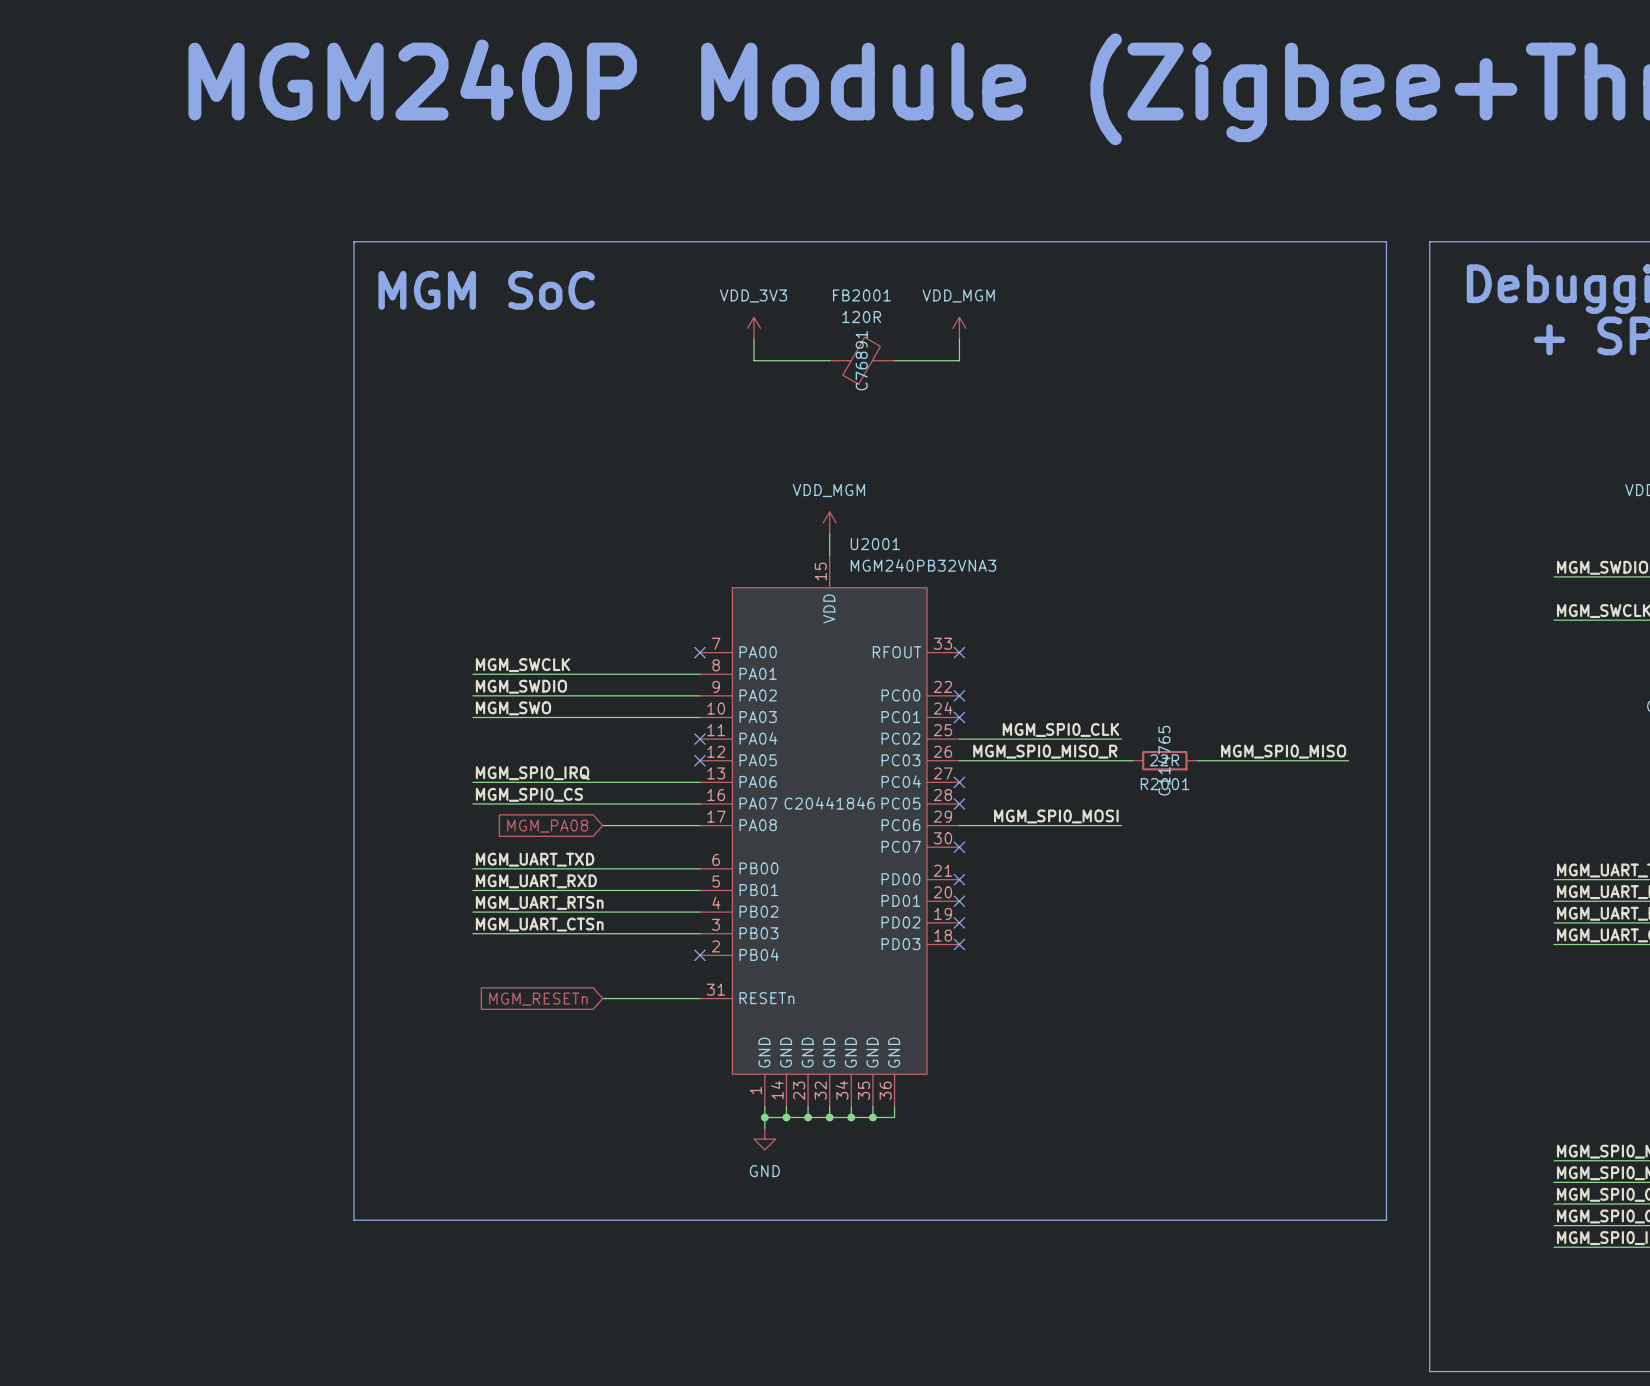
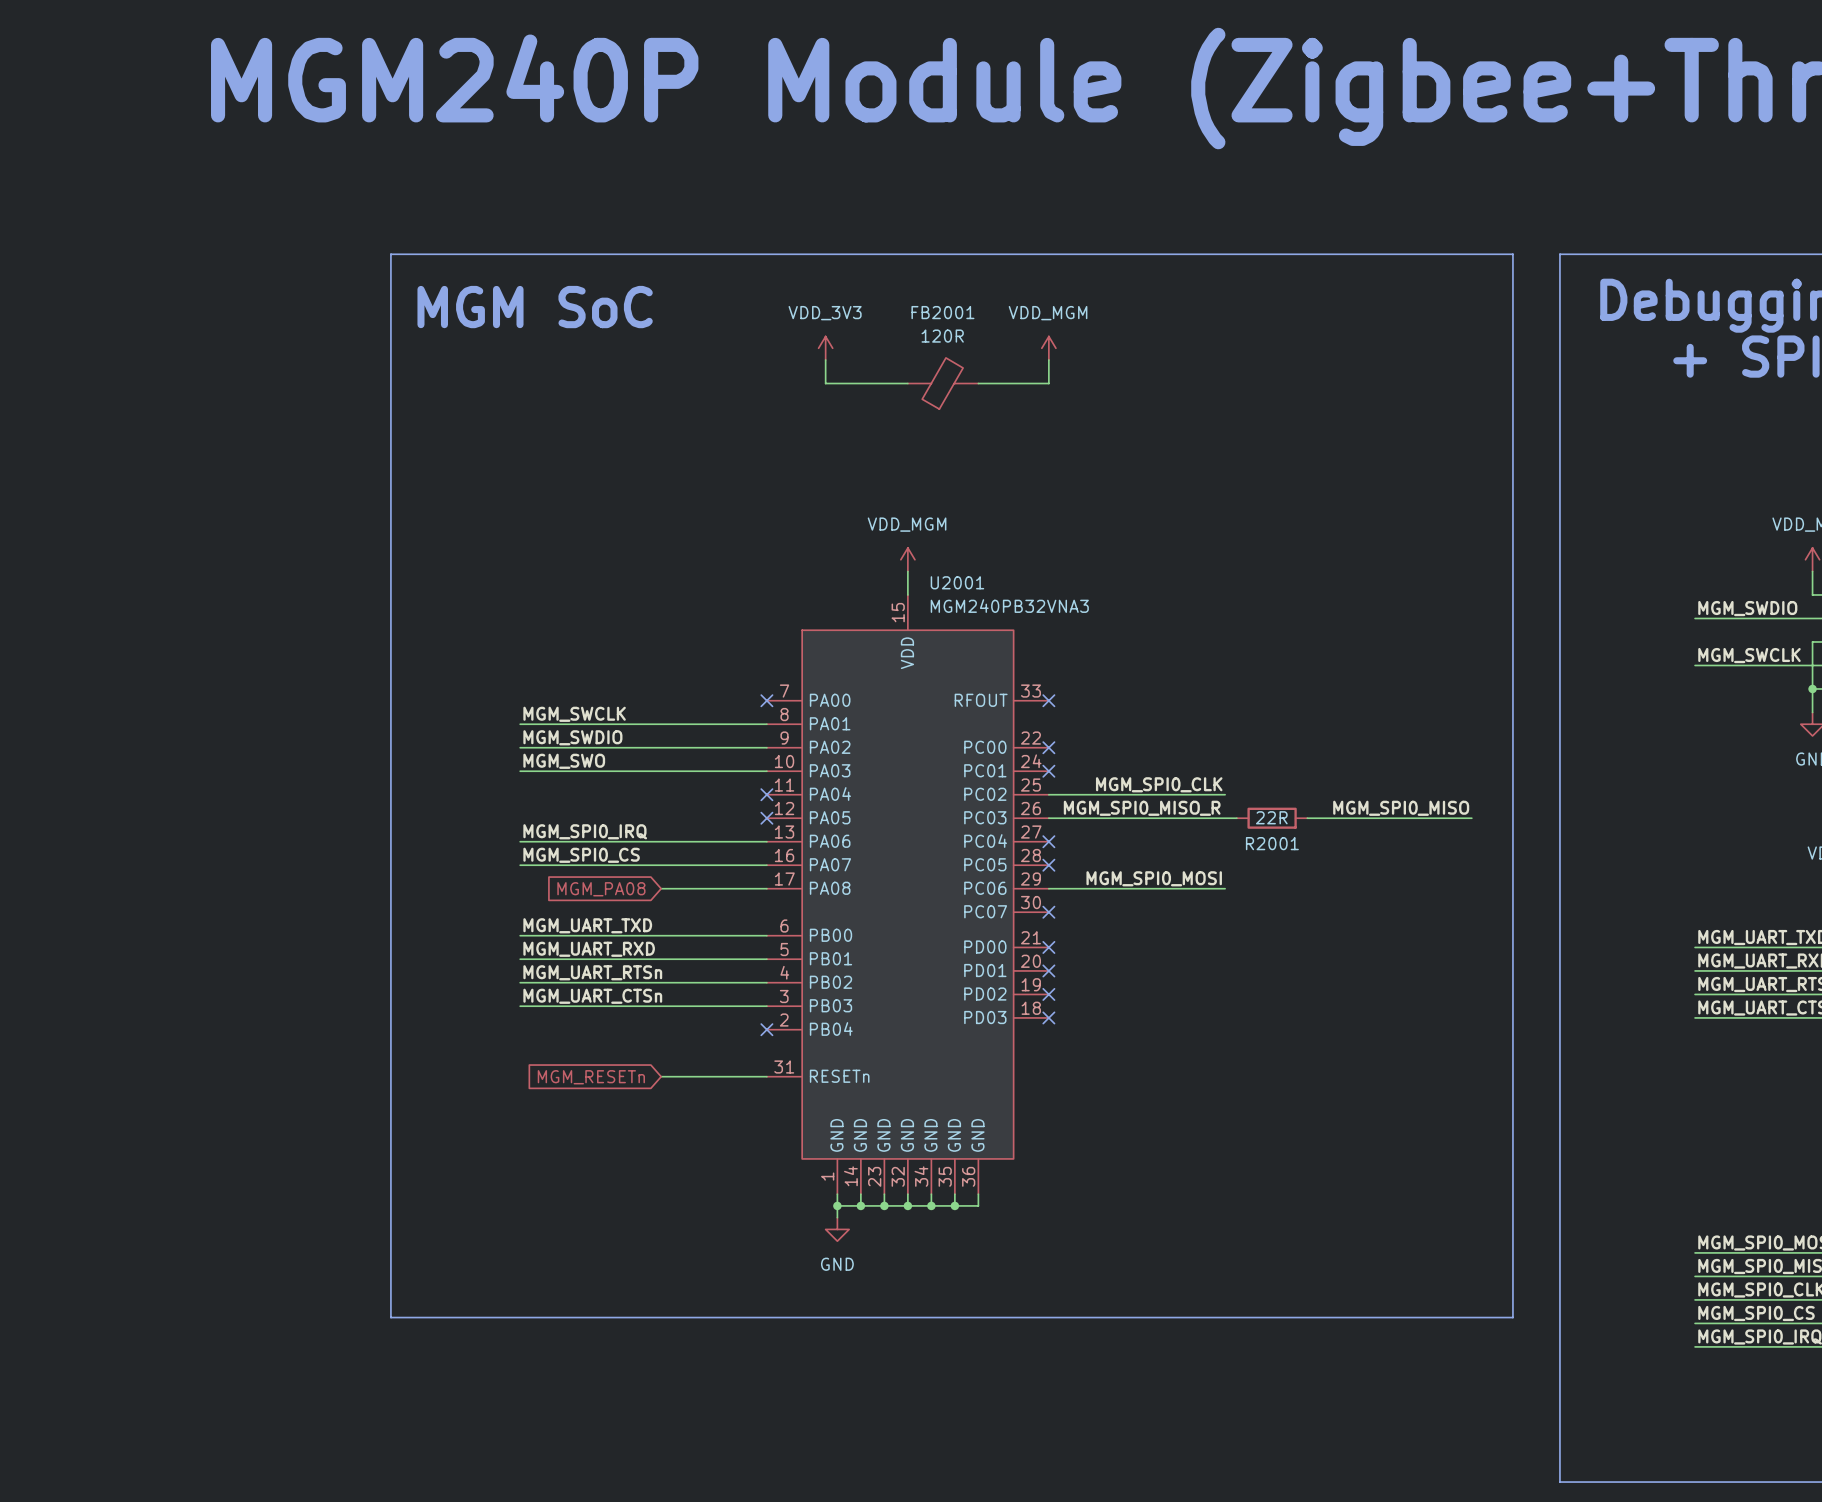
FB2001 text: C76891 (861, 360) -> none
R2001 text: C114765 (1164, 760) -> none
U2001 text: C20441846 (829, 803) -> none

